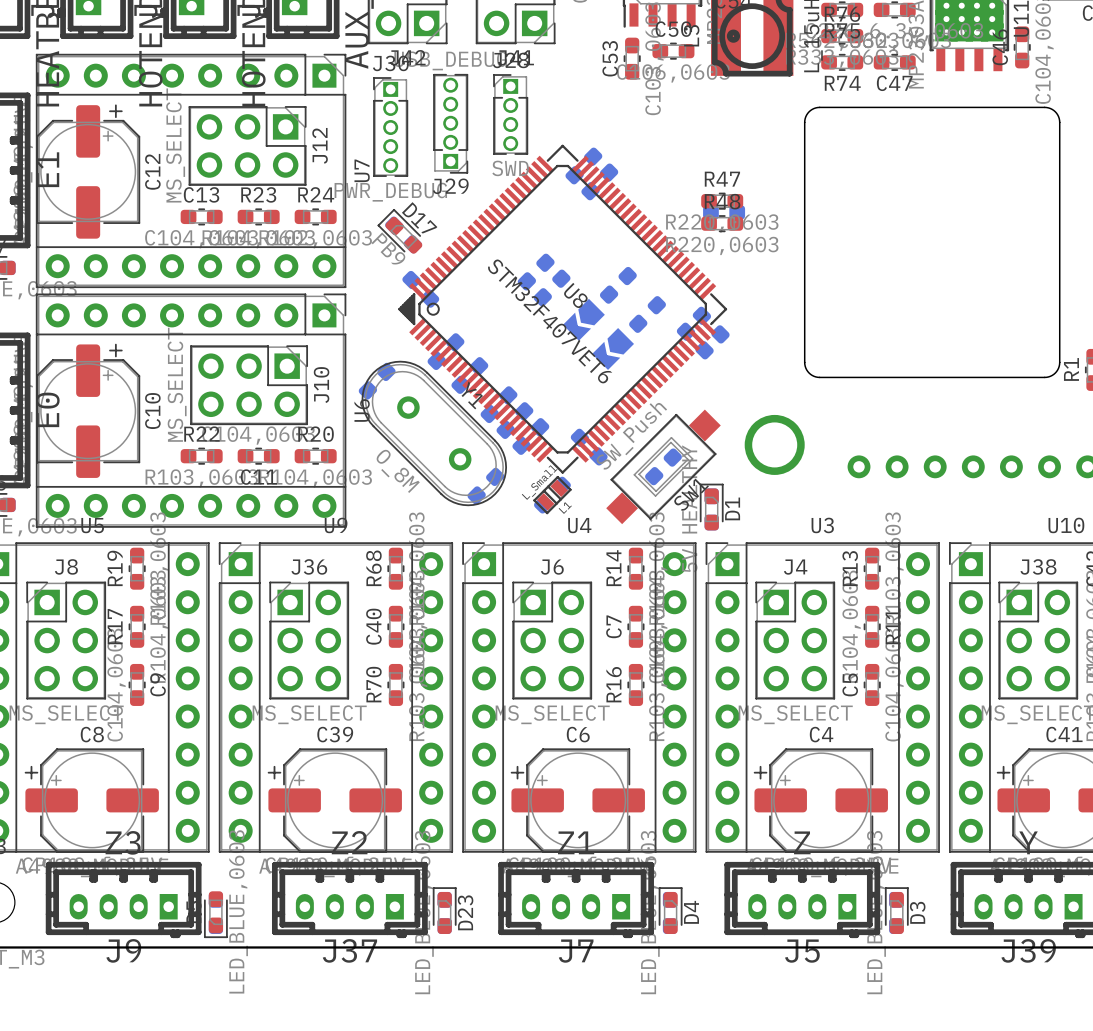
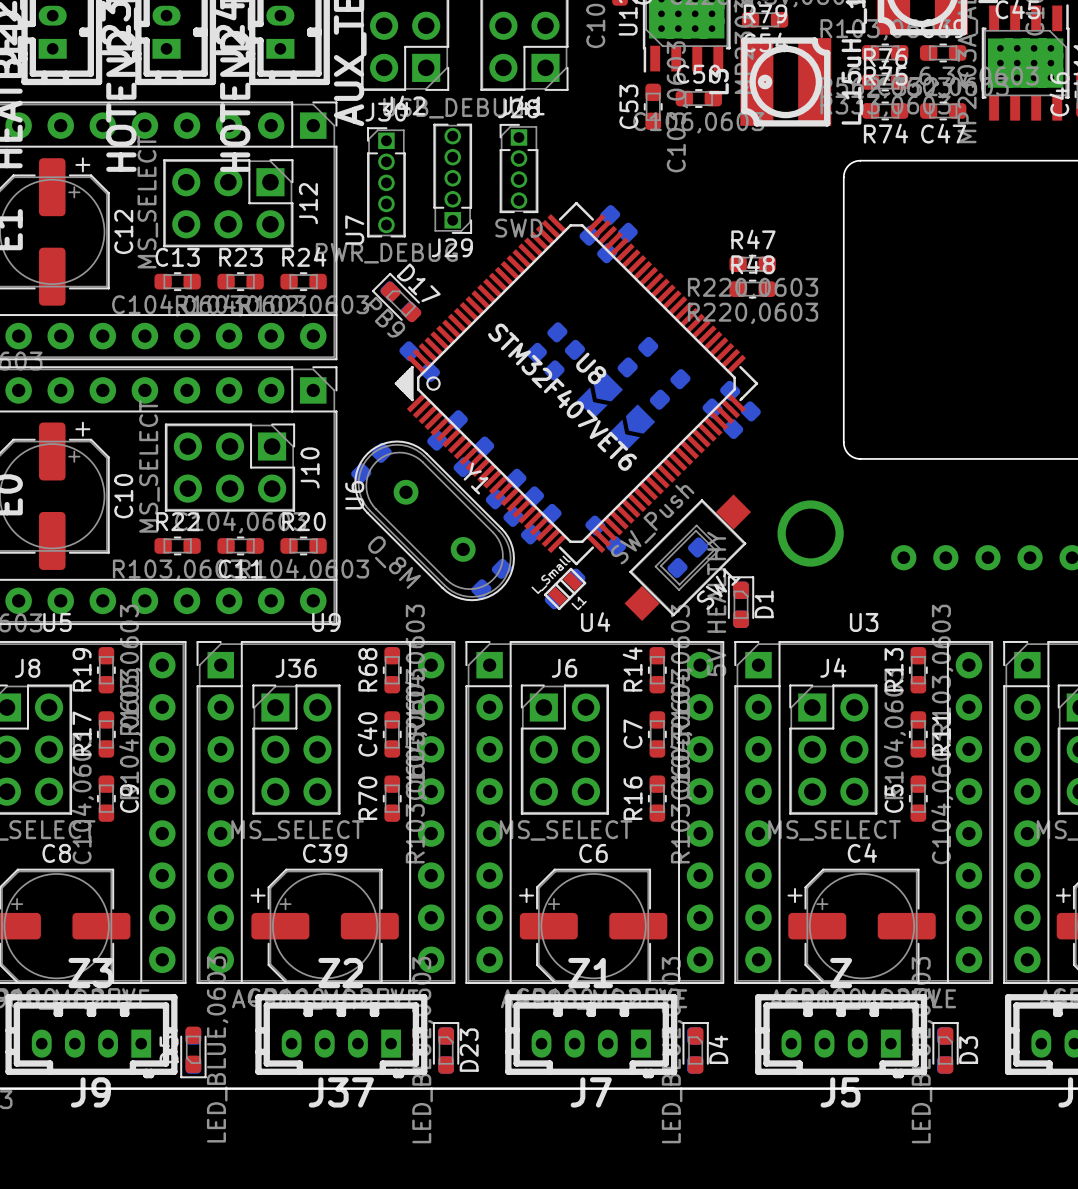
part: (724, 212) -> none

